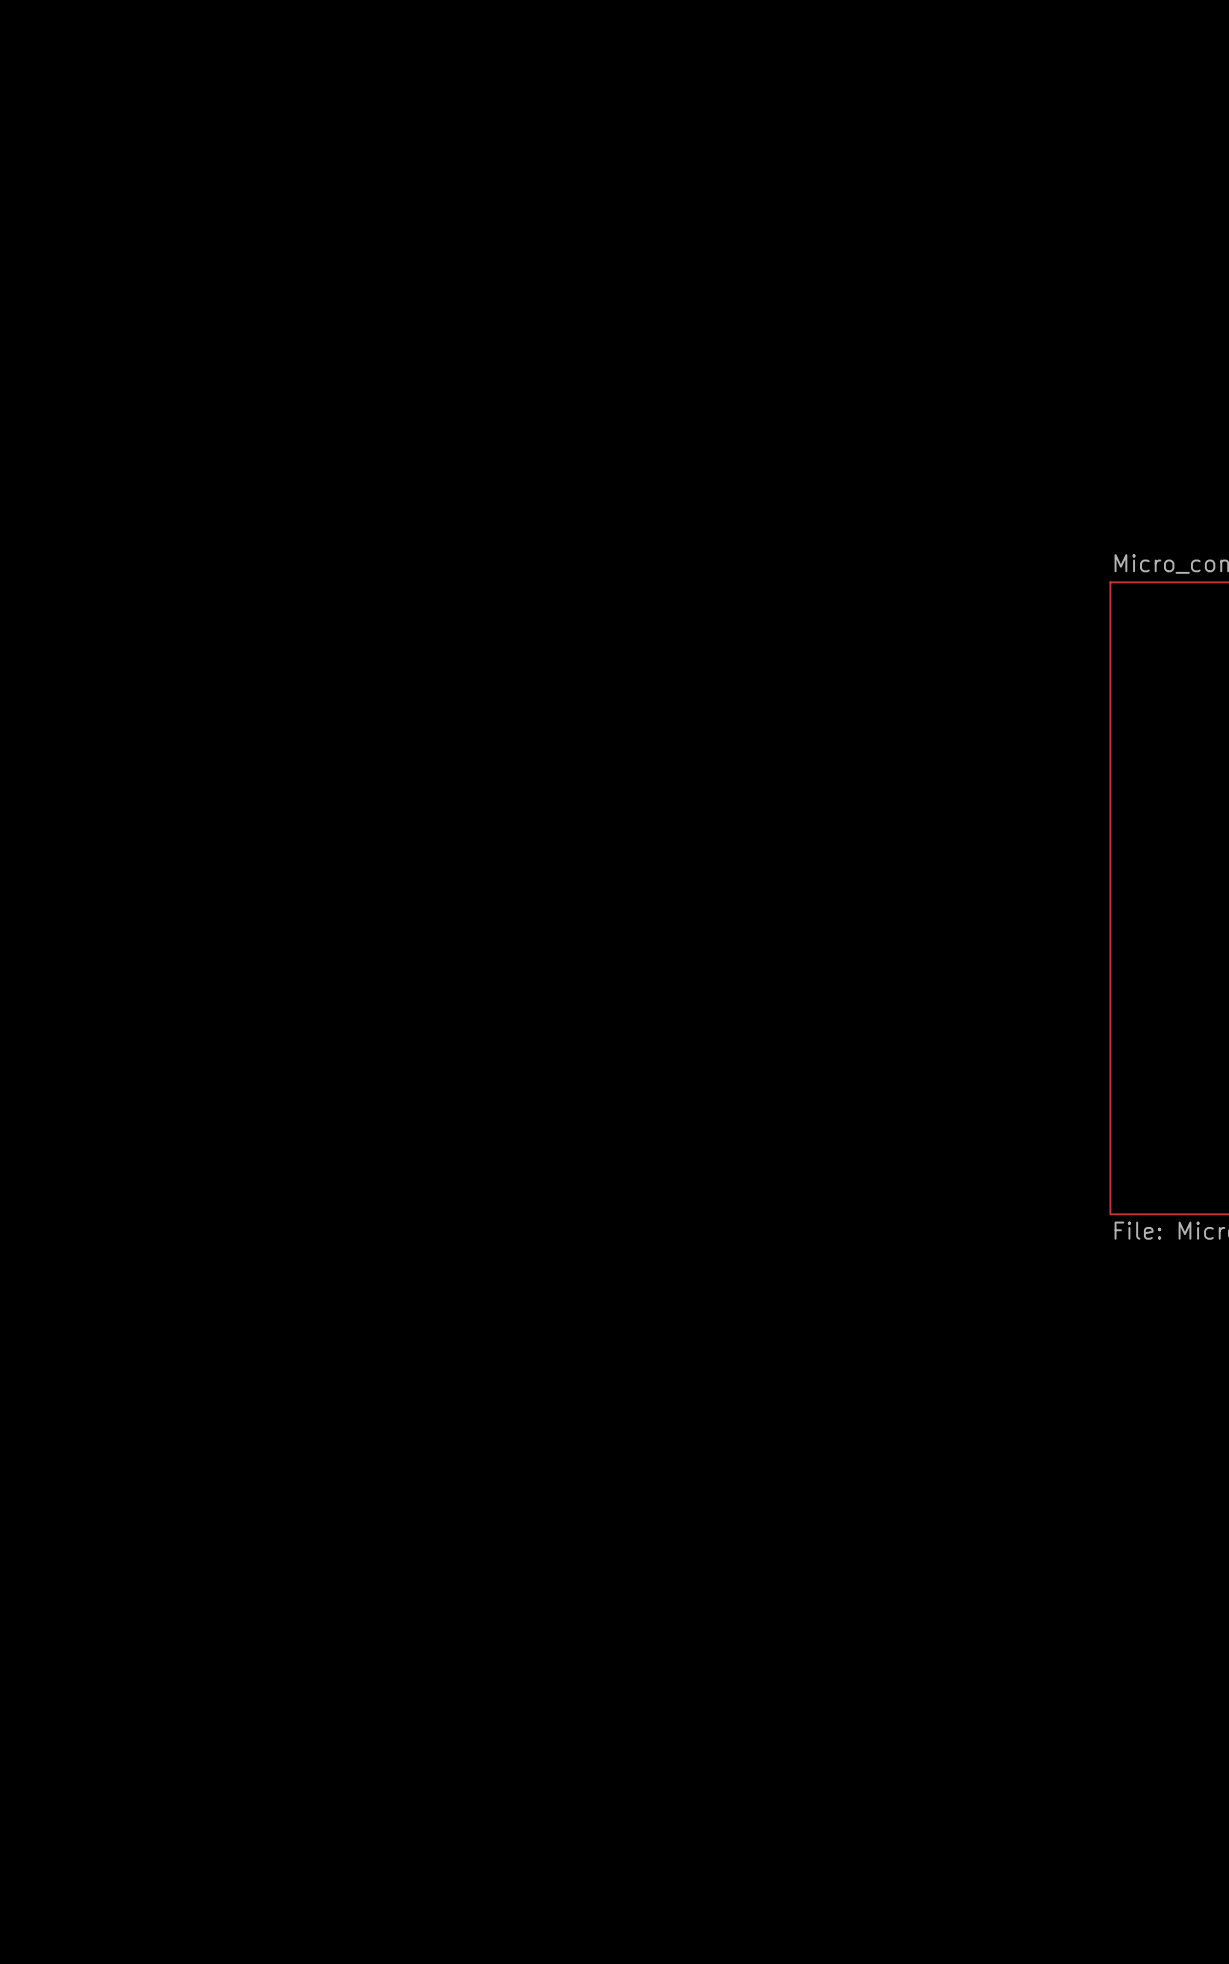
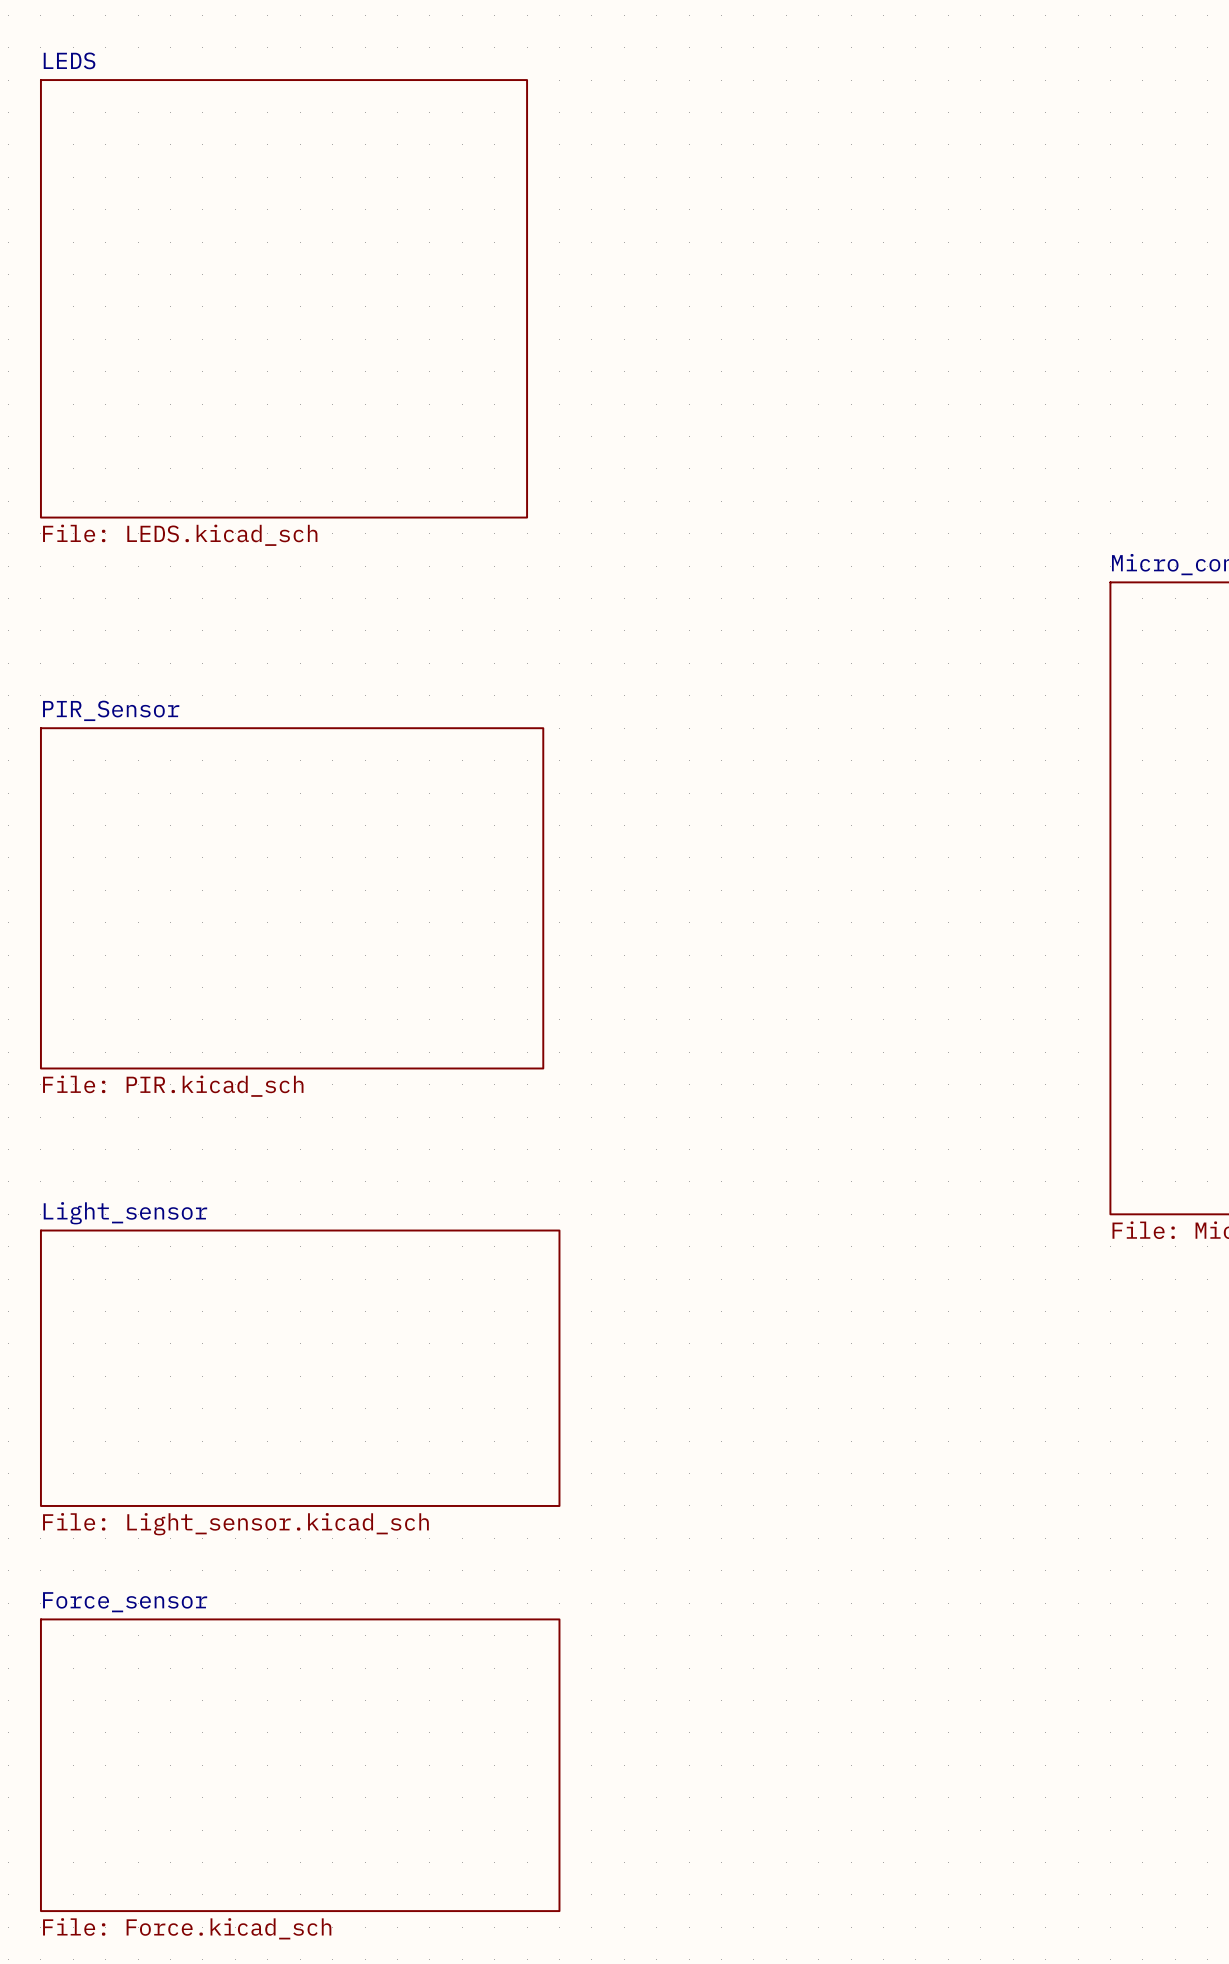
sheet LEDS: none -> File: LEDS.kicad_sch (284, 298)
sheet PIR_Sensor: none -> File: PIR.kicad_sch (292, 898)
sheet Light_sensor: none -> File: Light_sensor.kicad_sch (300, 1368)
sheet Force_sensor: none -> File: Force.kicad_sch (300, 1765)

